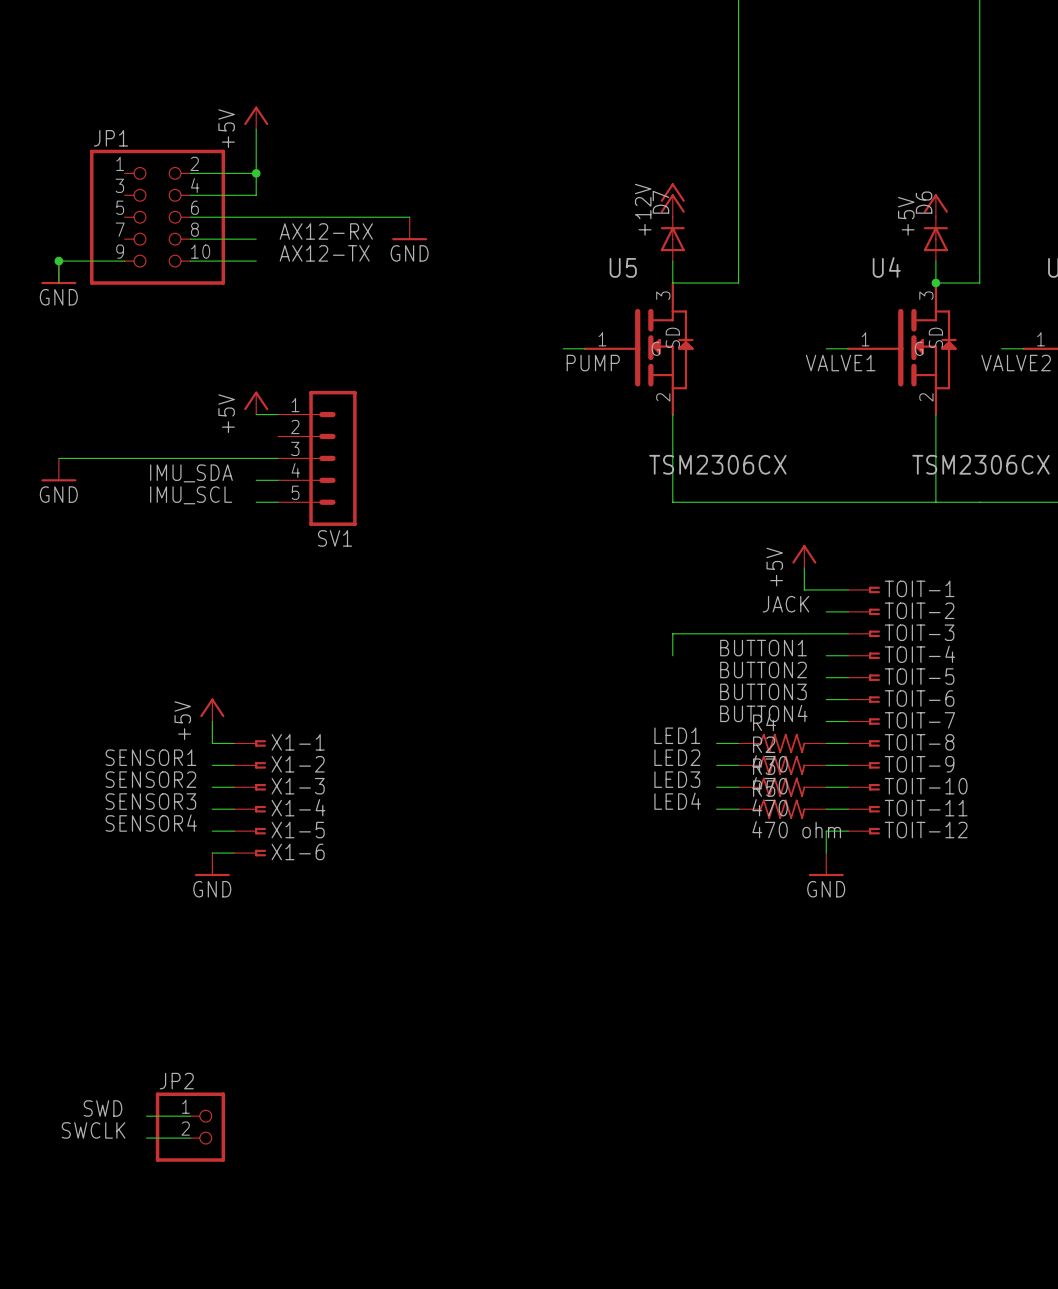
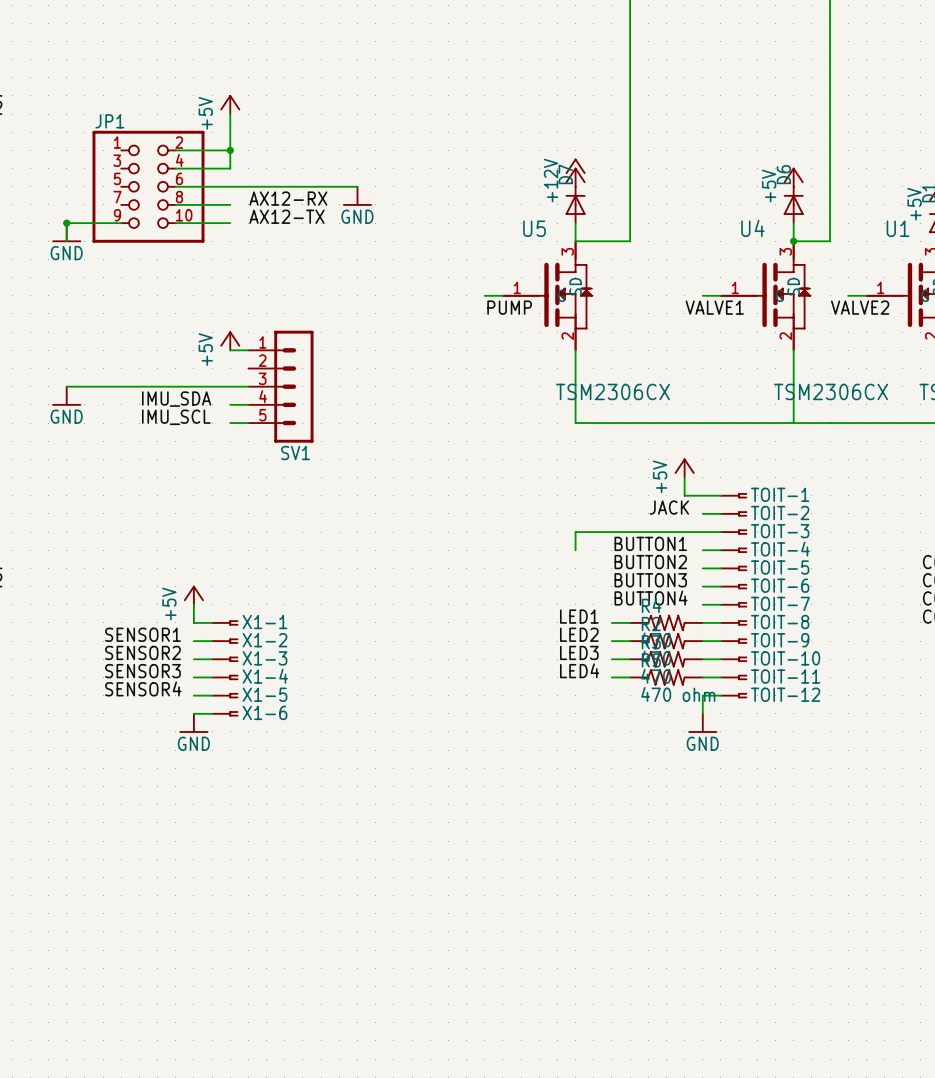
label: SWD (102, 1108) -> none
wire: (146, 1116) (190, 1116) -> none
JP2: (190, 1127) -> none
label: SWCLK (93, 1130) -> none
wire: (146, 1138) (190, 1138) -> none

